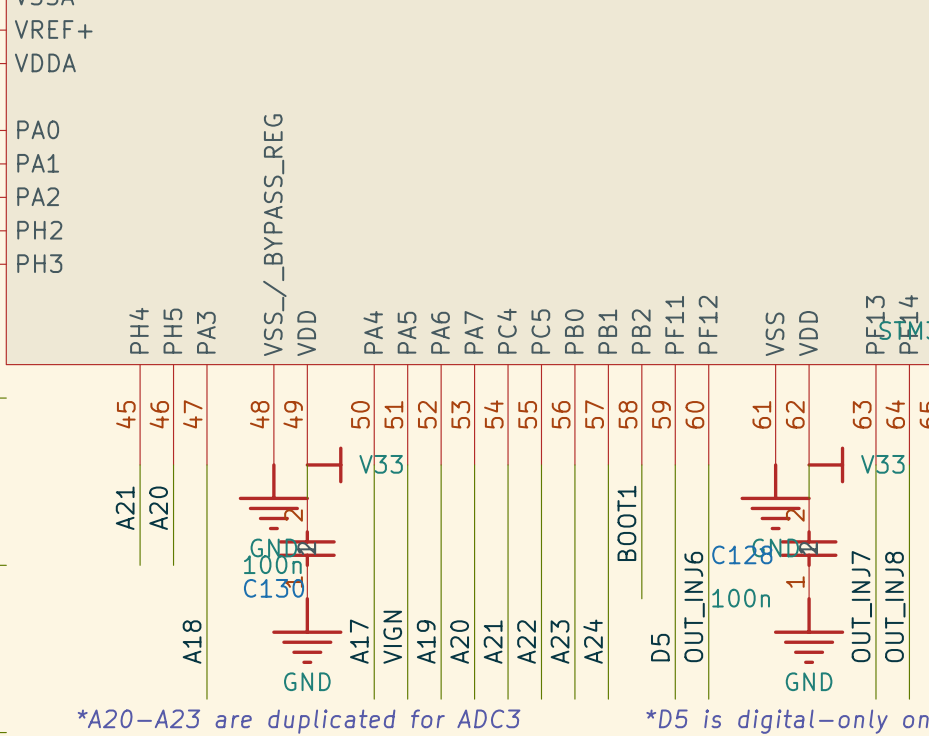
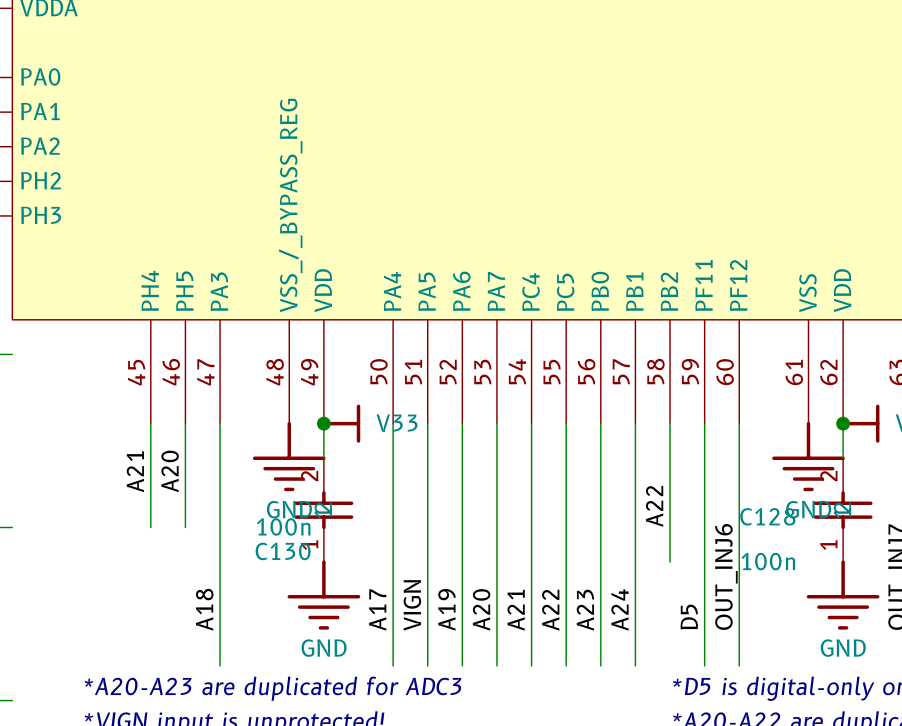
junction: none -> (323, 423)
junction: none -> (843, 423)
label: BOOT1 (626, 523) -> A22 (654, 506)

